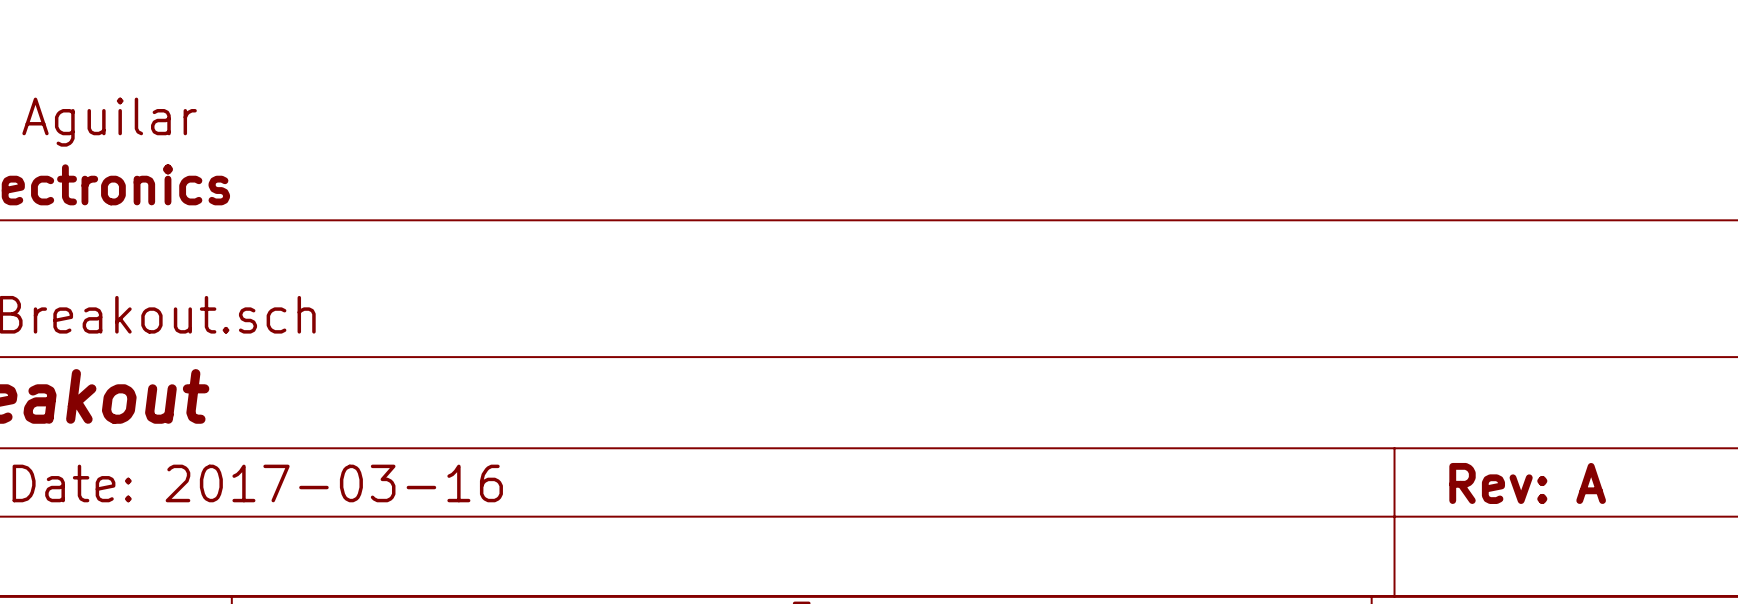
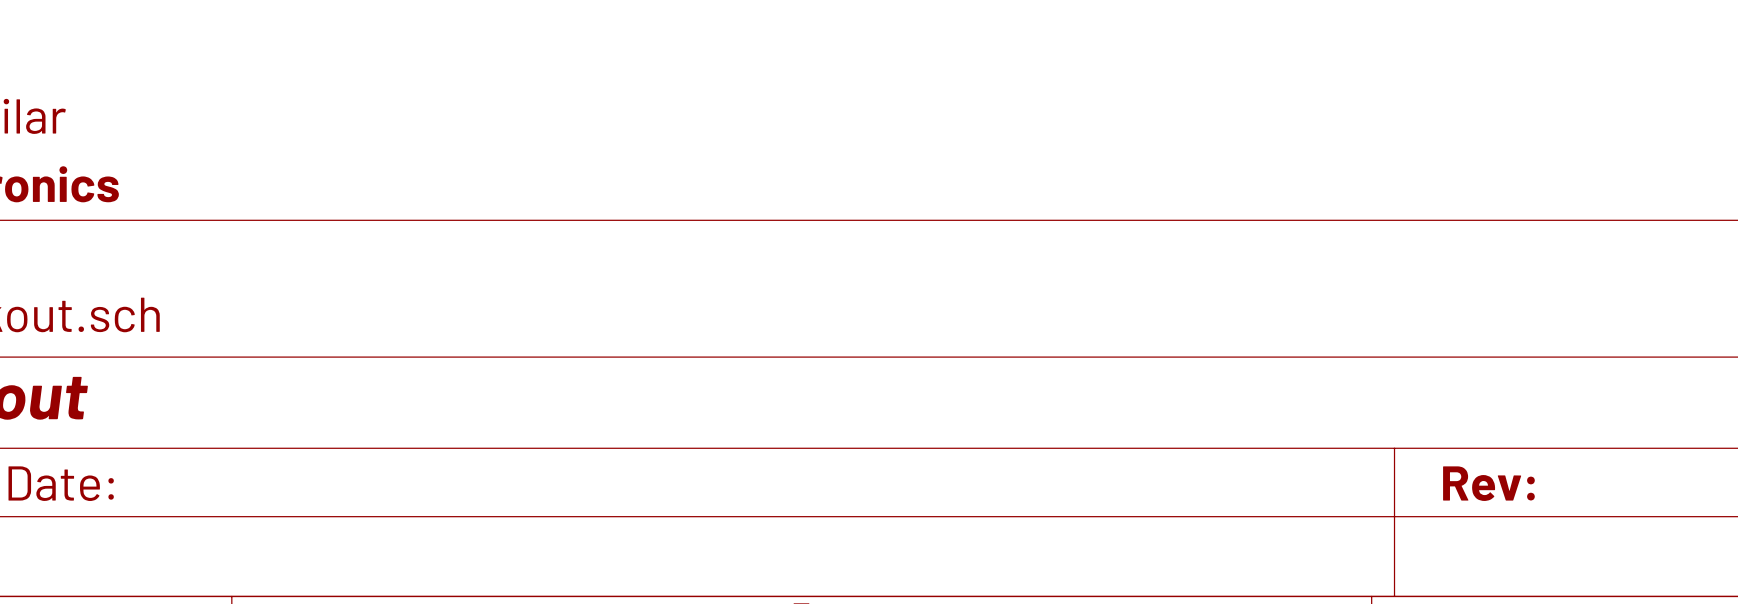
title block: Date: 2017-03-16 (257, 483) -> Date: (61, 483)
title block: Rev: A (1527, 483) -> Rev: (1488, 483)

